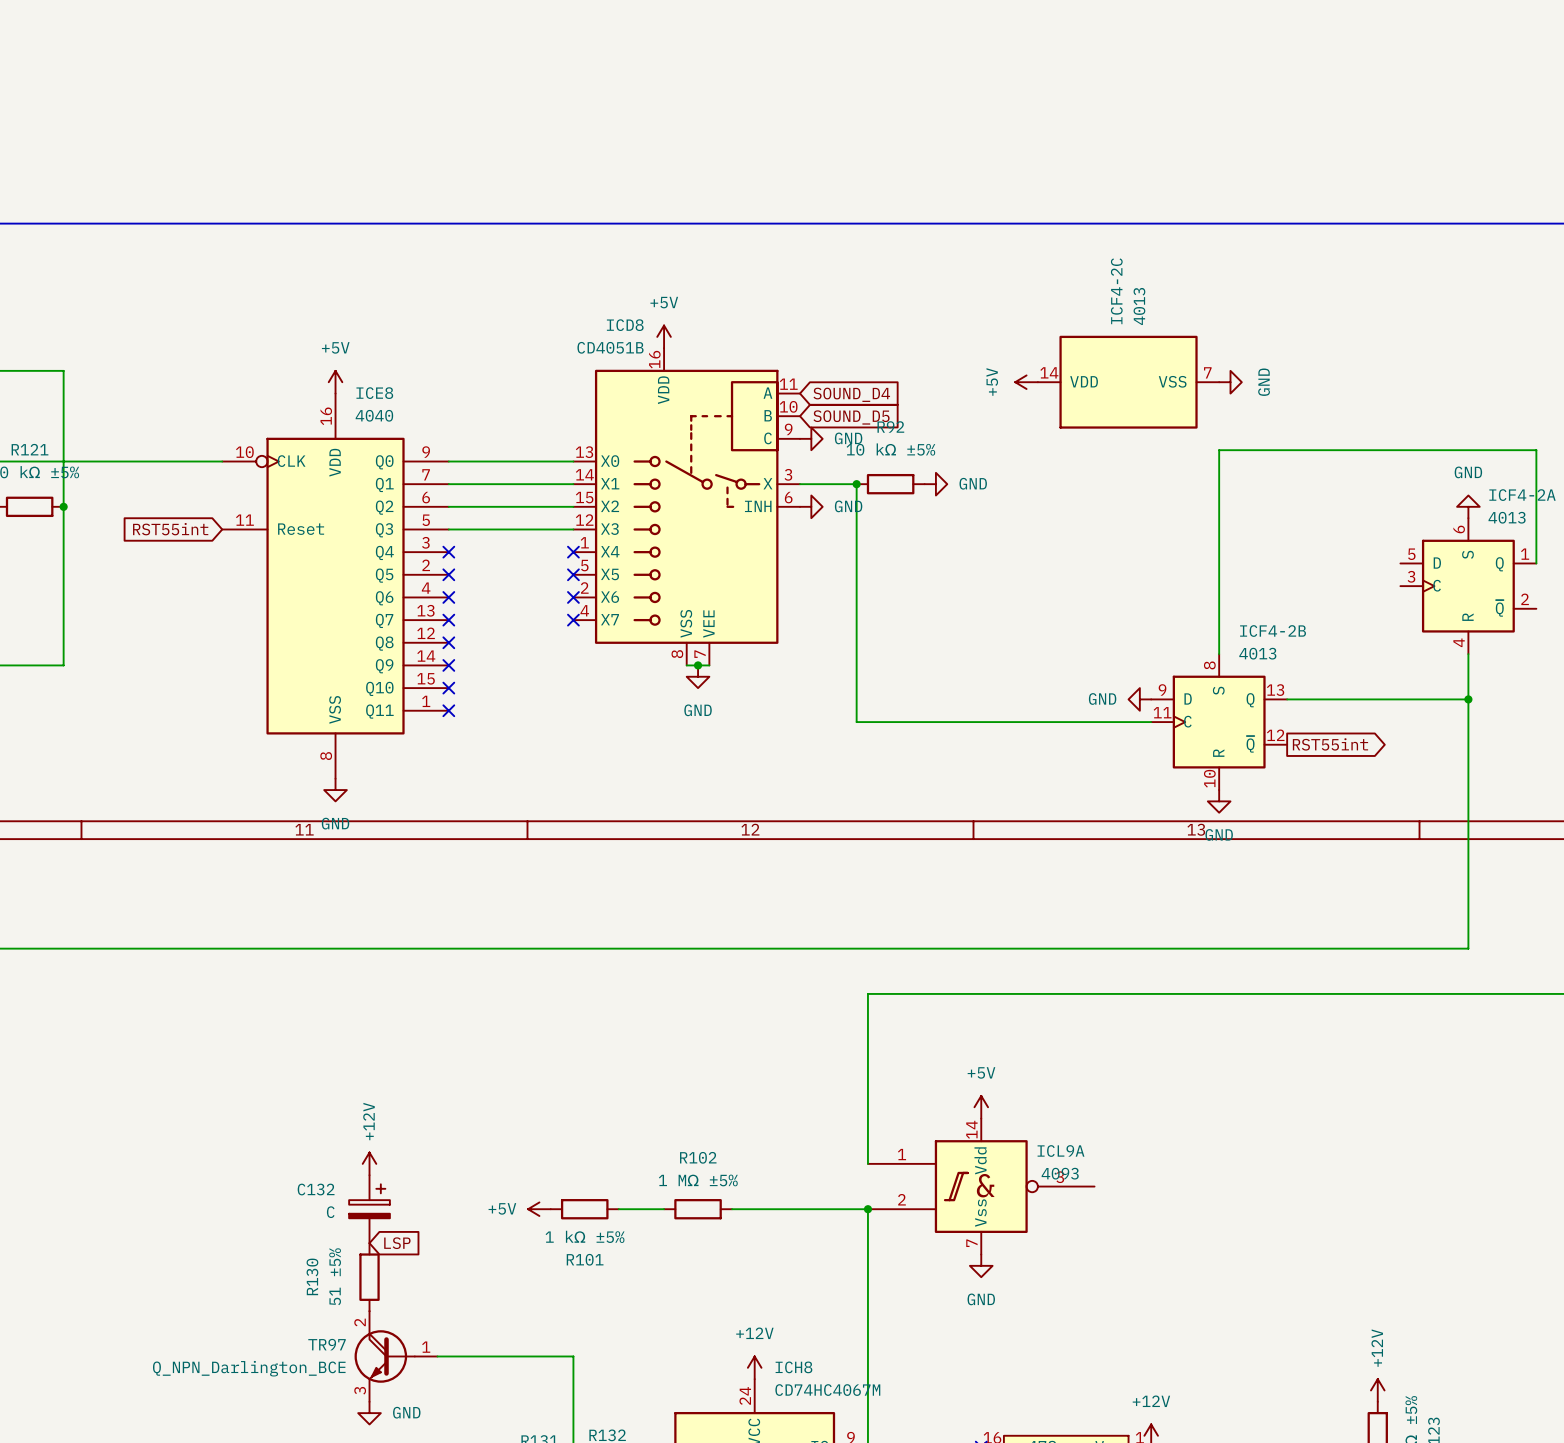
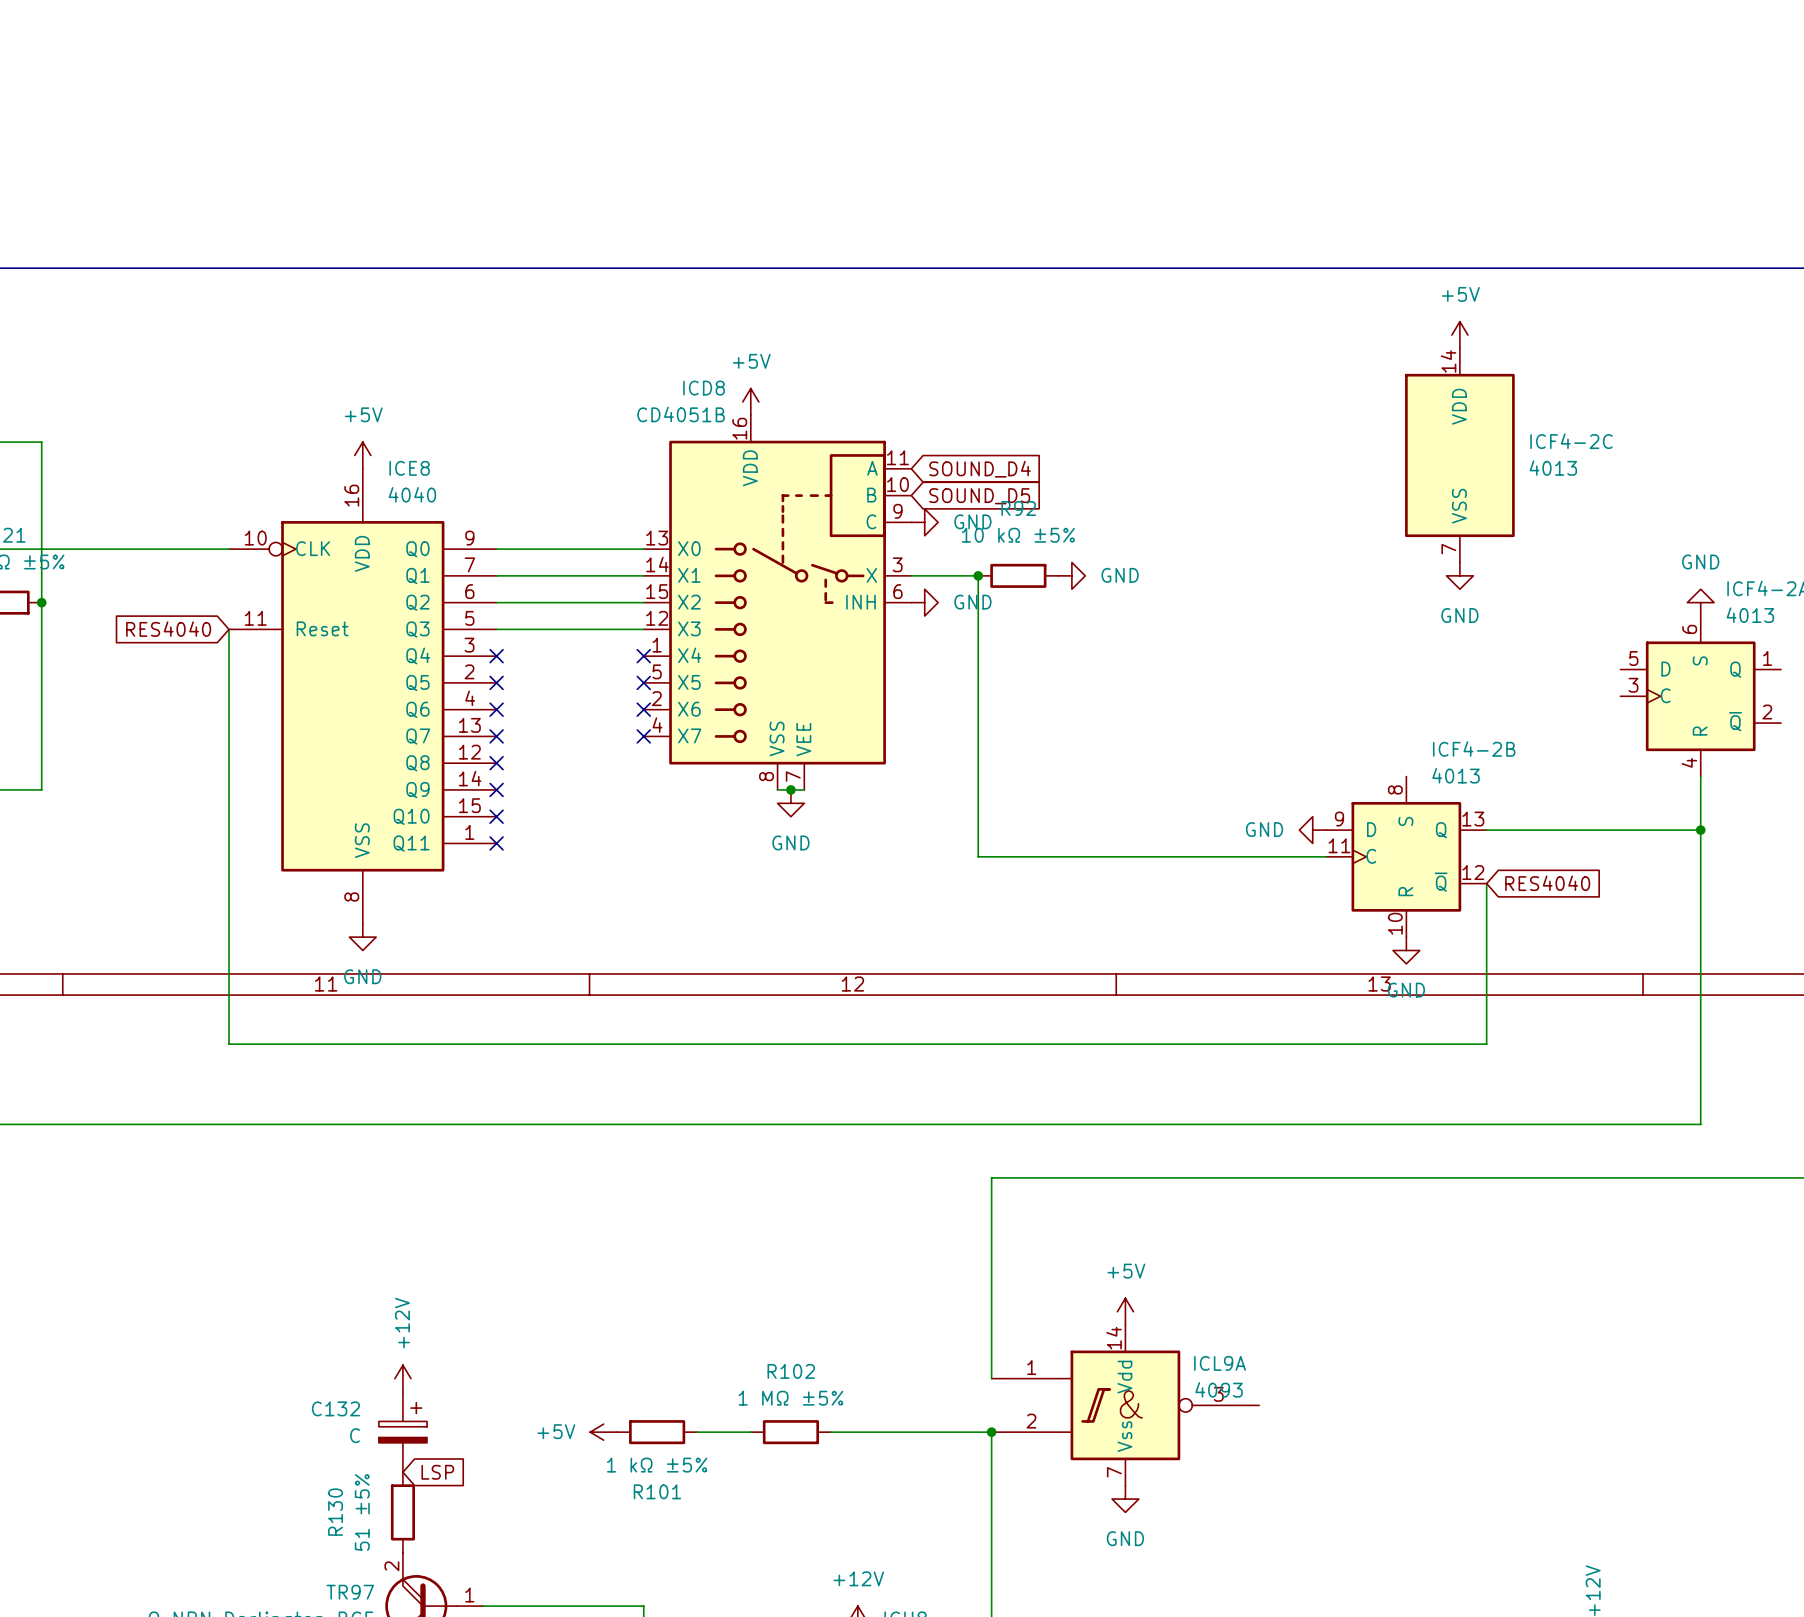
power symbol: none -> +5V (1459, 335)
power symbol: +5V (1026, 382) -> none
ICF4-2C rotation: 0° (1128, 382) -> 90° clockwise (1459, 455)
ICF4-2C position: (1128, 382) -> (1459, 455)
power symbol rotation: 0° (1230, 382) -> 90° clockwise (1459, 575)
power symbol position: GND (1230, 382) -> GND (1459, 575)
global label: RST55int (170, 529) -> RES4040 (168, 629)
wire: none -> (229, 629) (229, 1044) (1486, 1044) (1486, 883)
wire: (1536, 563) (1536, 450) (1219, 450) (1219, 654) -> none
global label shape: output (1330, 744) -> input (1547, 883)
global label: RST55int (1330, 744) -> RES4040 (1547, 883)

